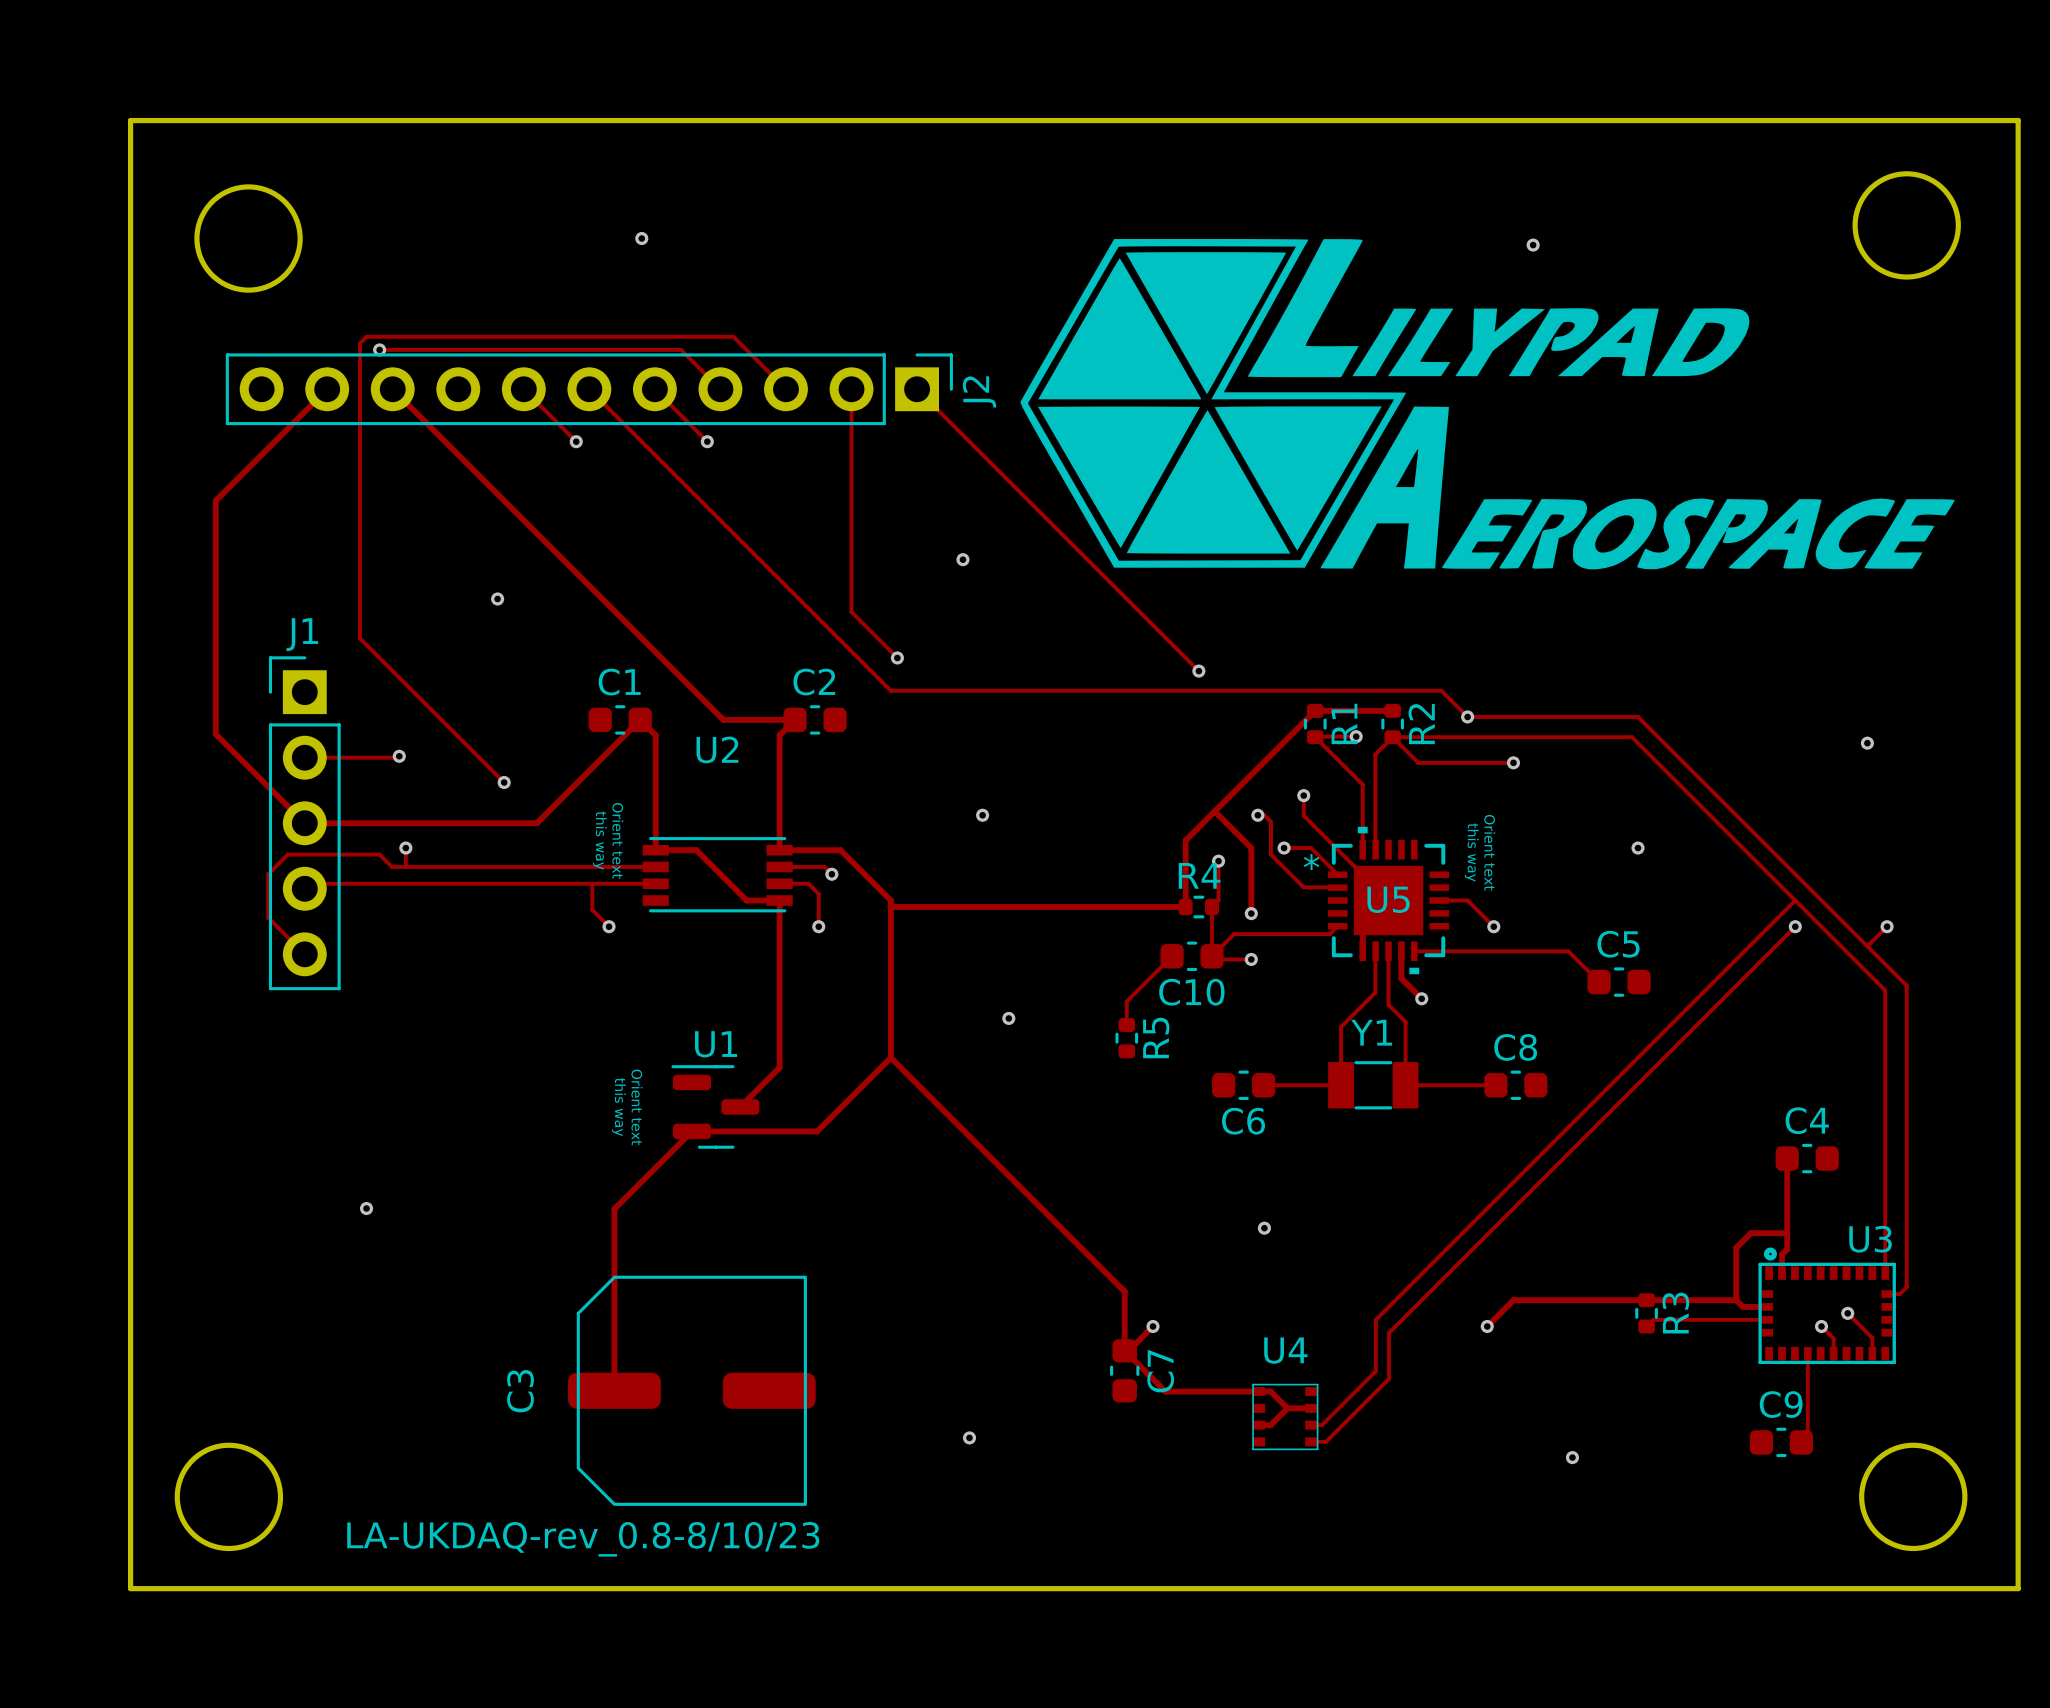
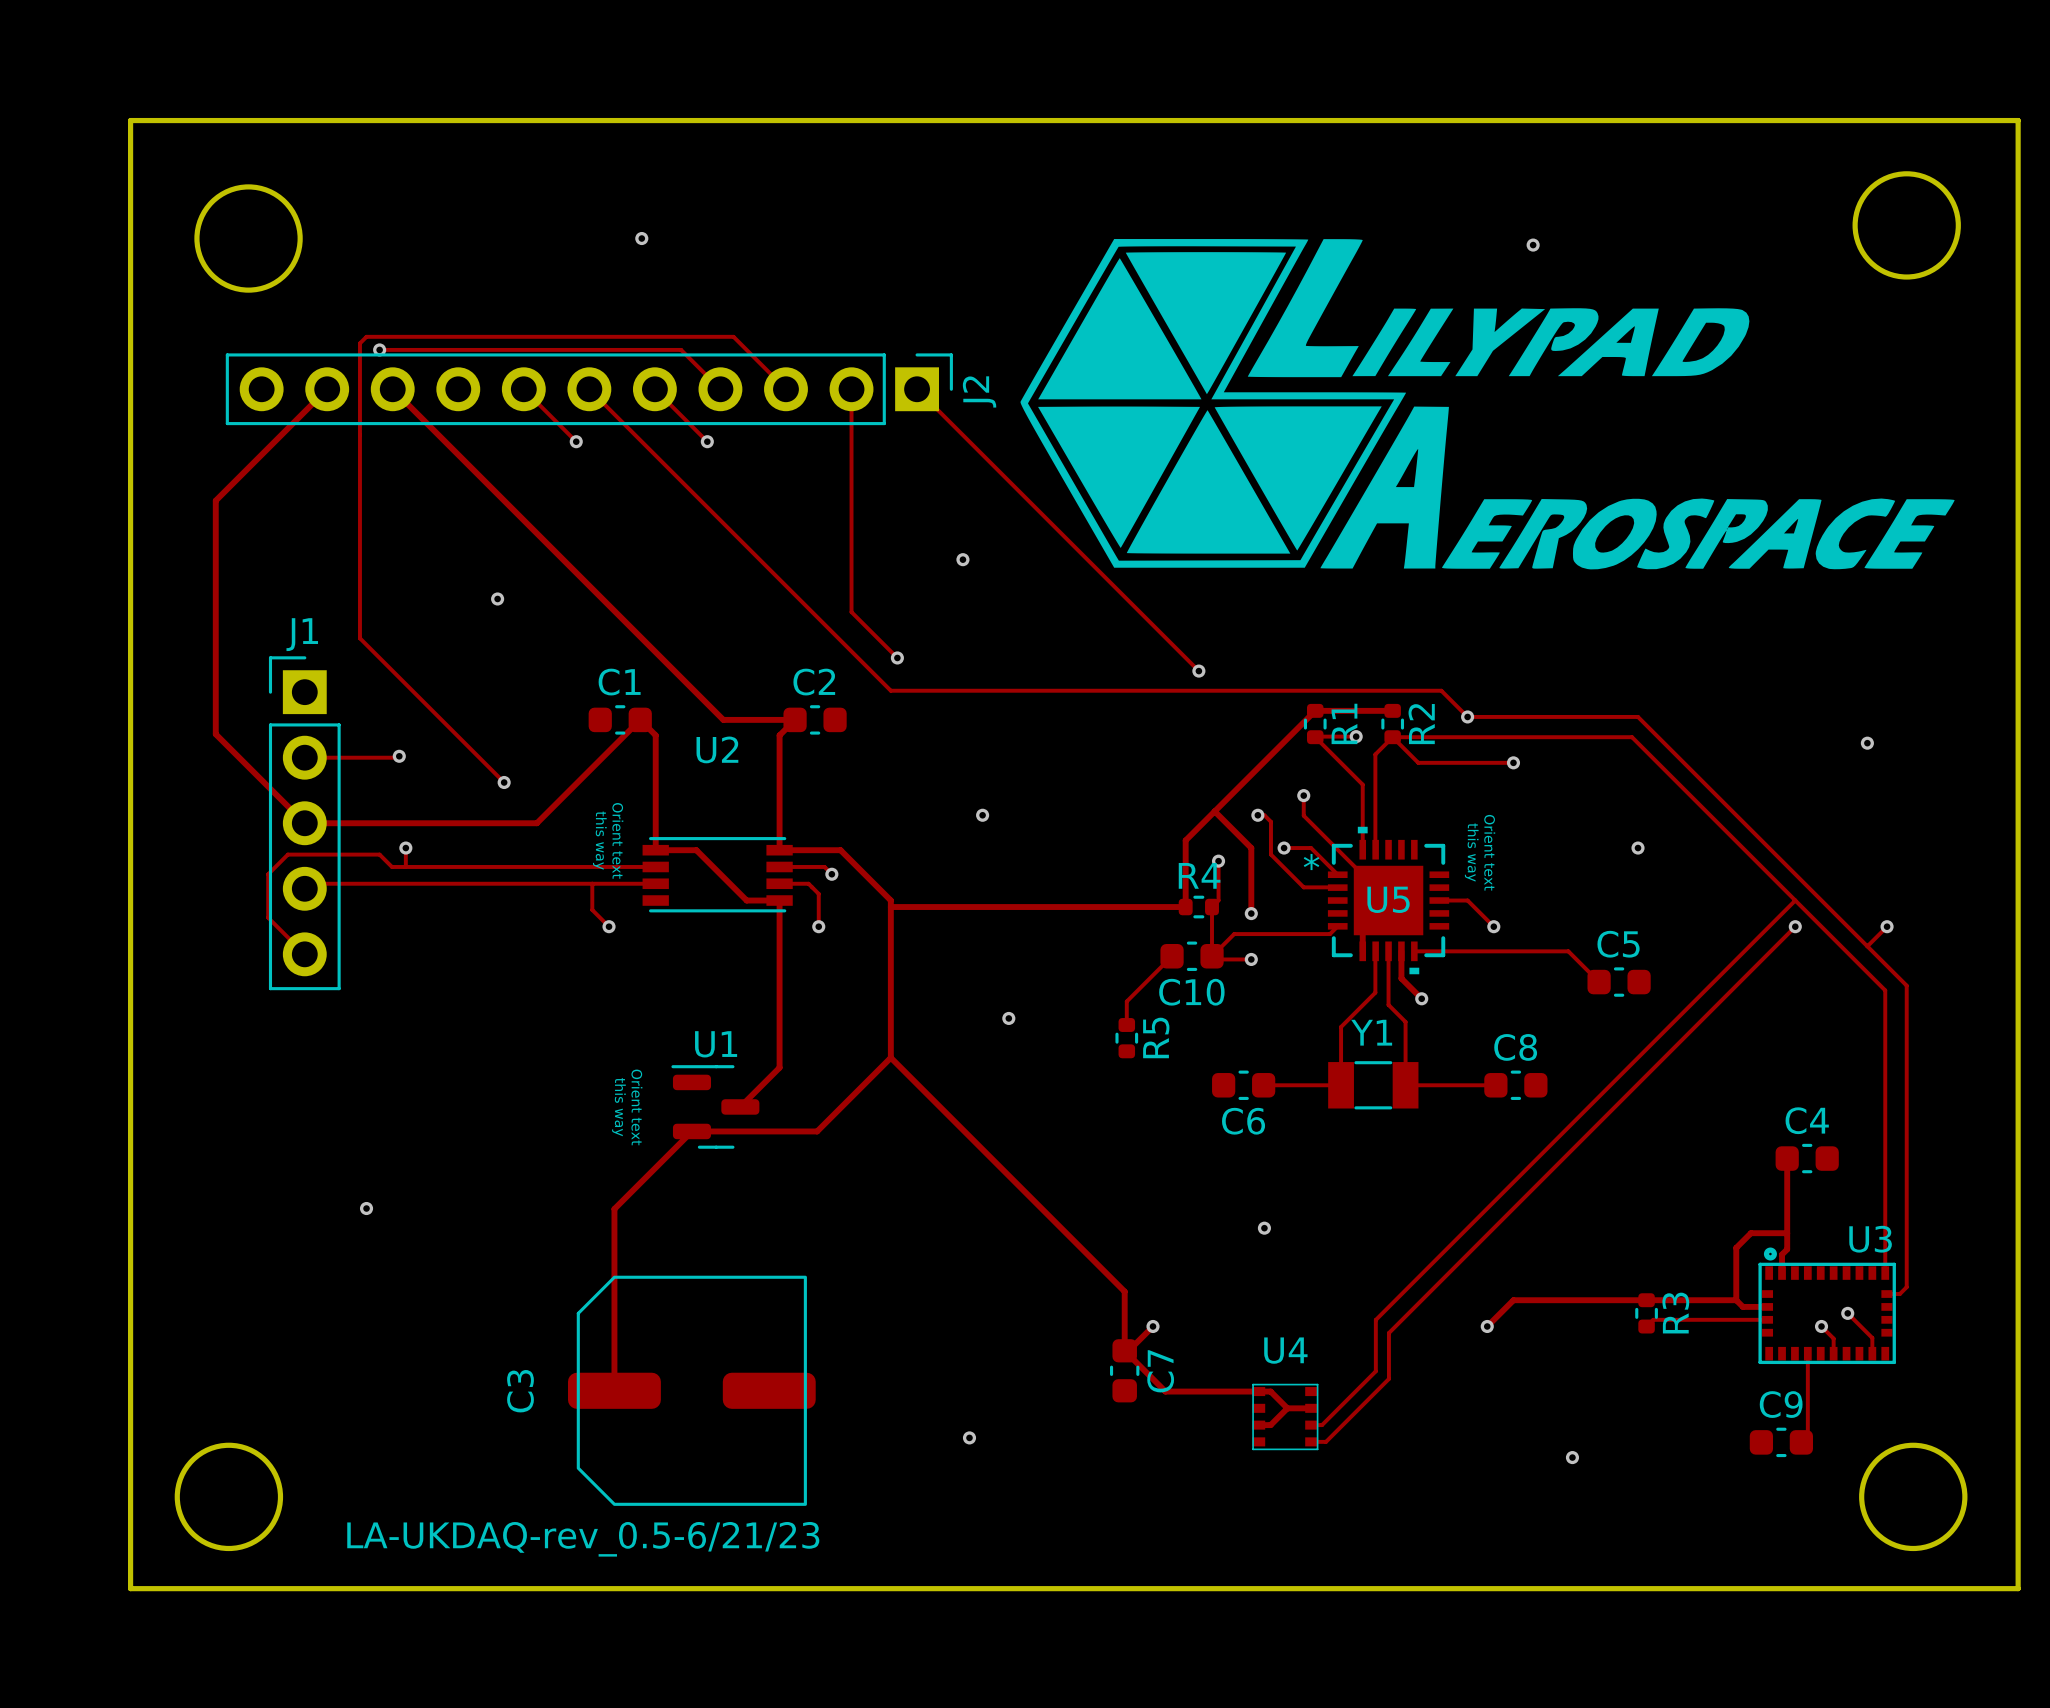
text: LA-UKDAQ-rev_0.8-8/10/23 (583, 1539) -> LA-UKDAQ-rev_0.5-6/21/23 (583, 1539)

